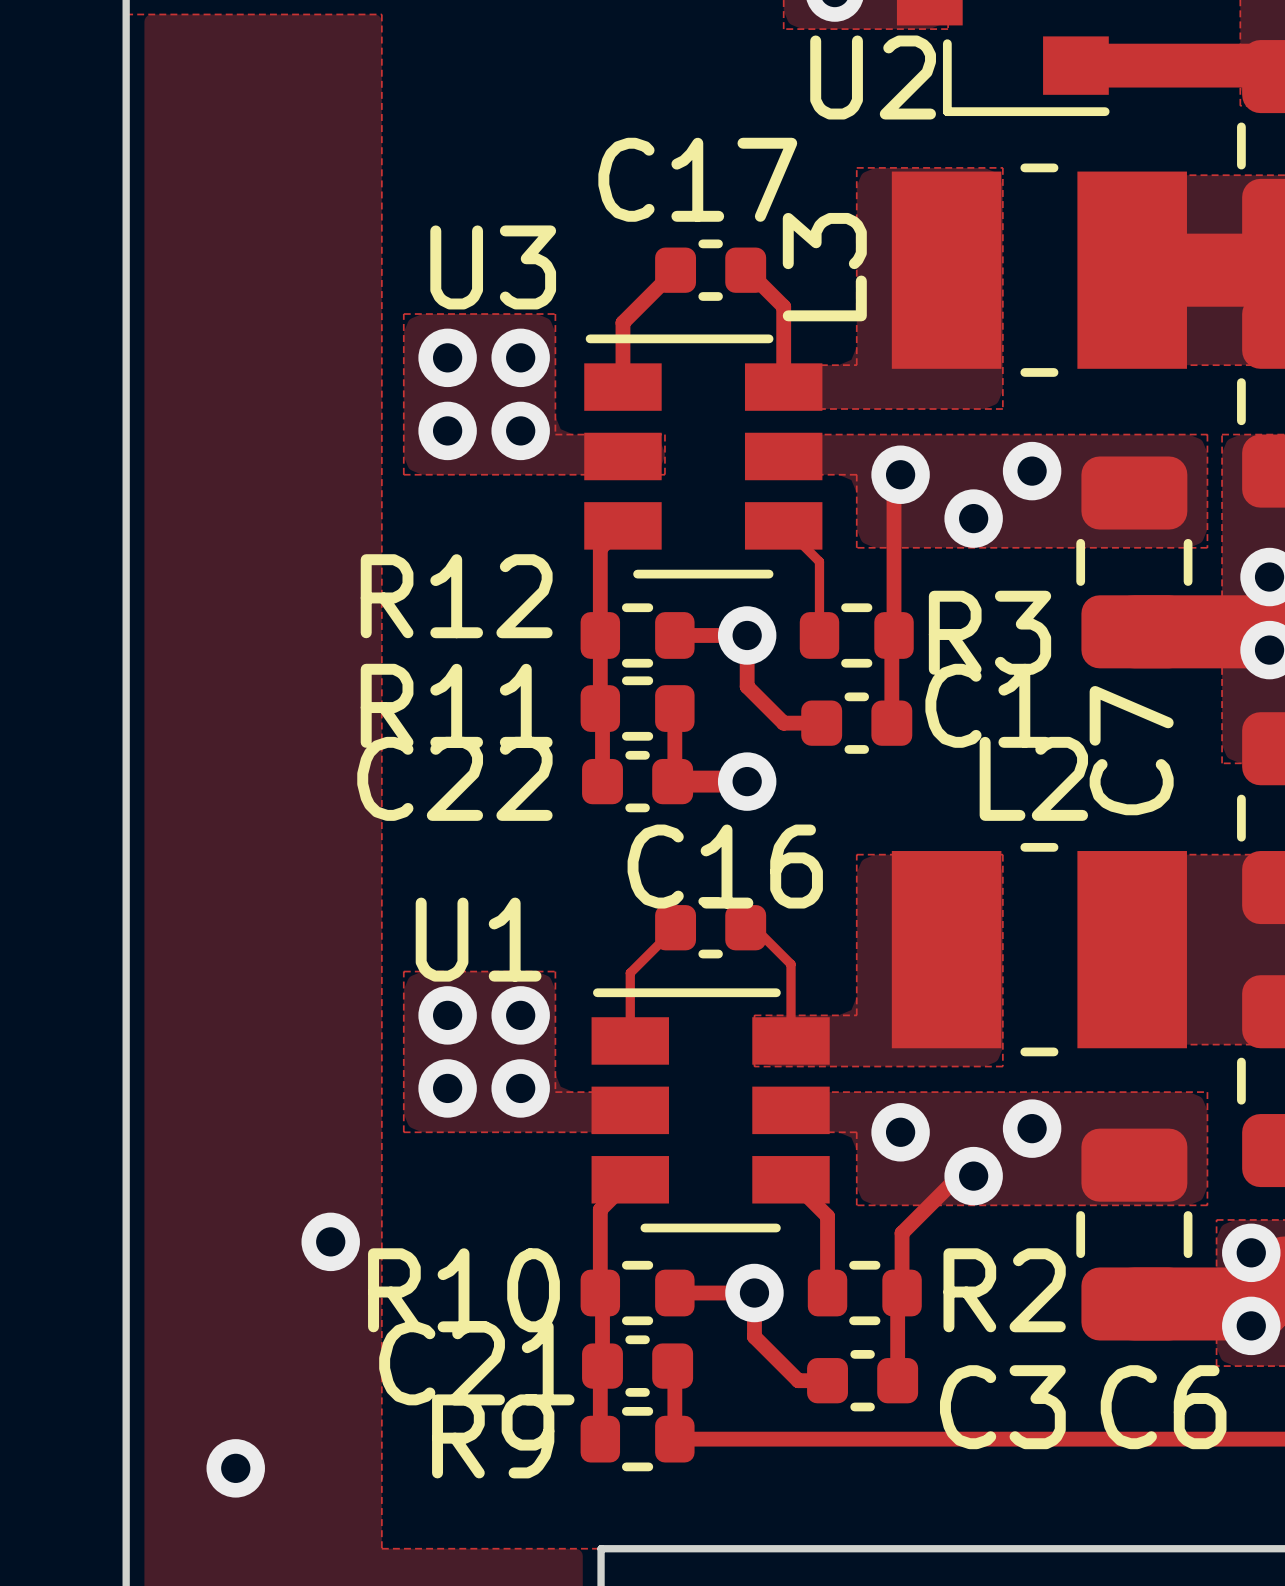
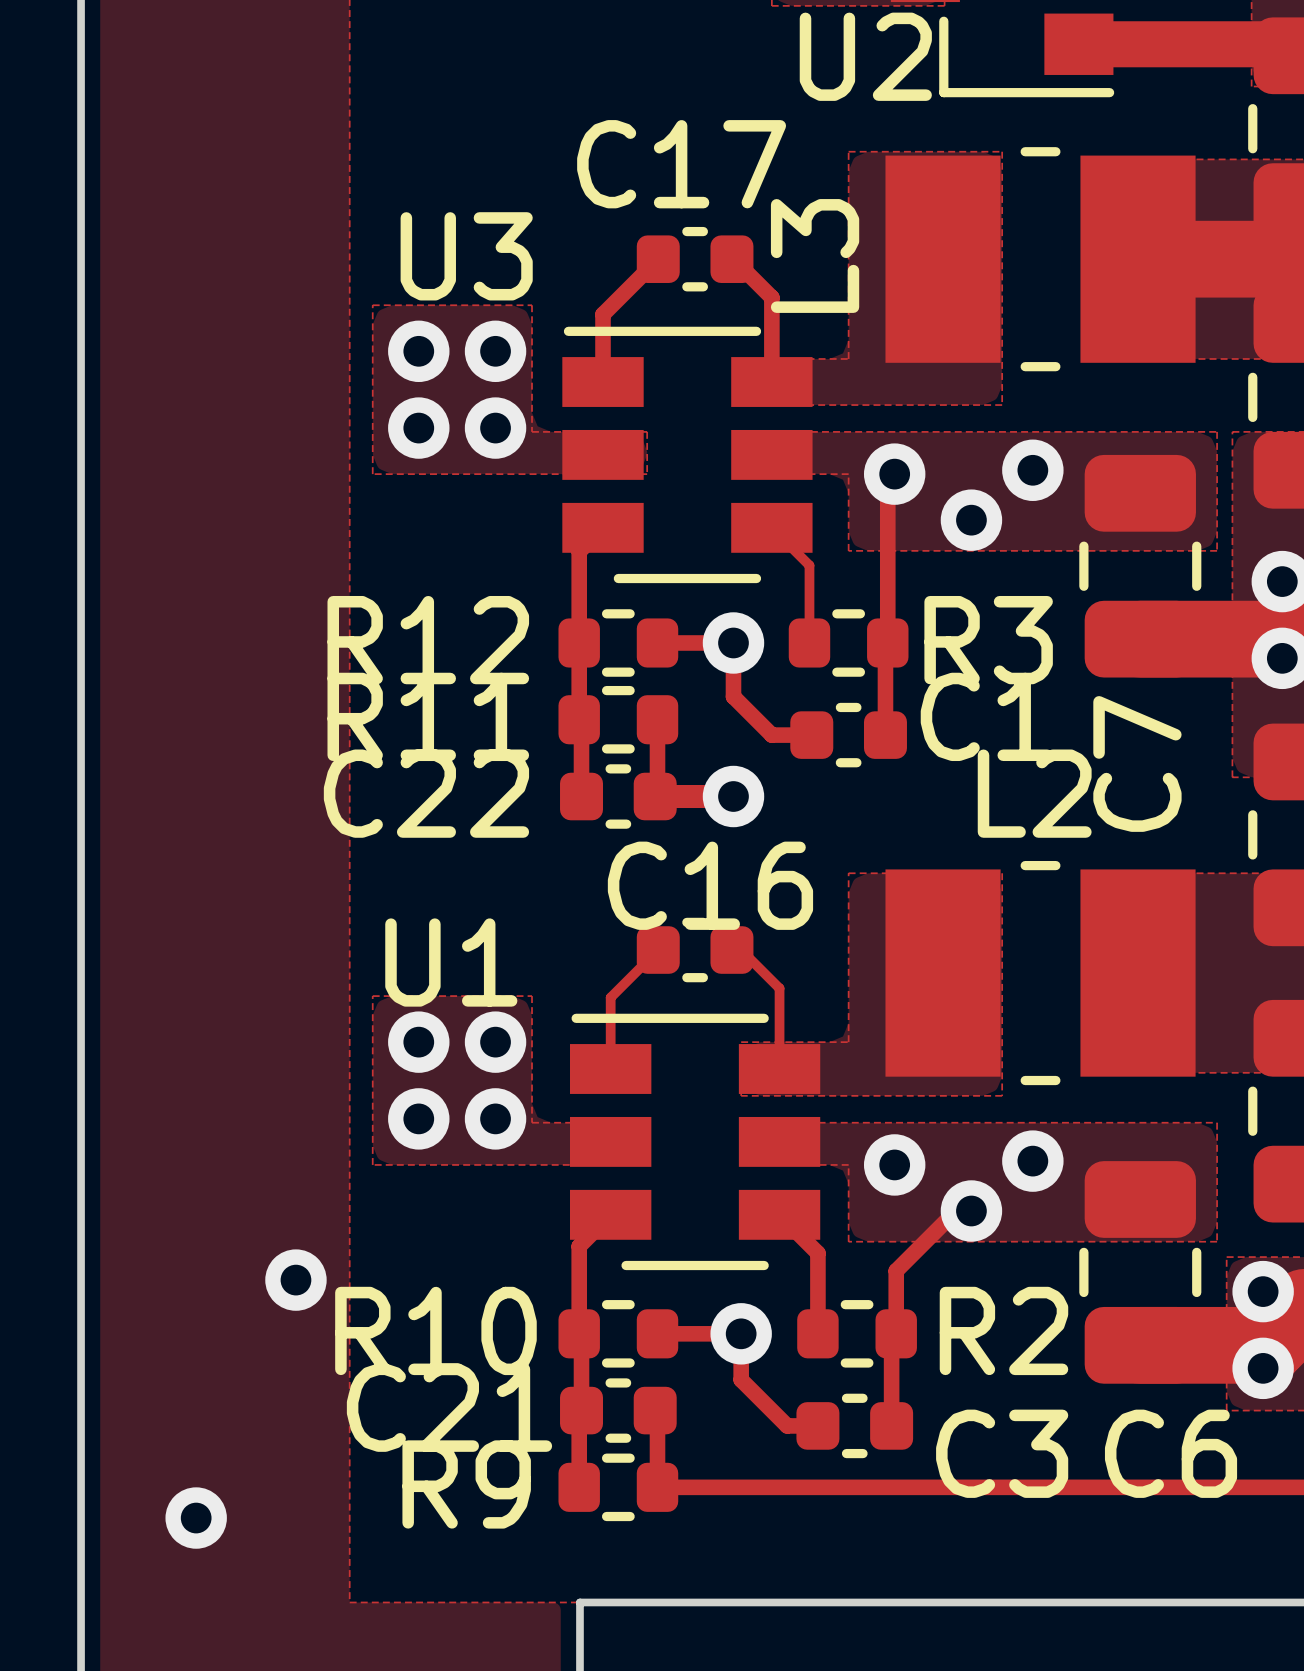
R12 name position: R12 (456, 596) -> R12 (428, 640)

